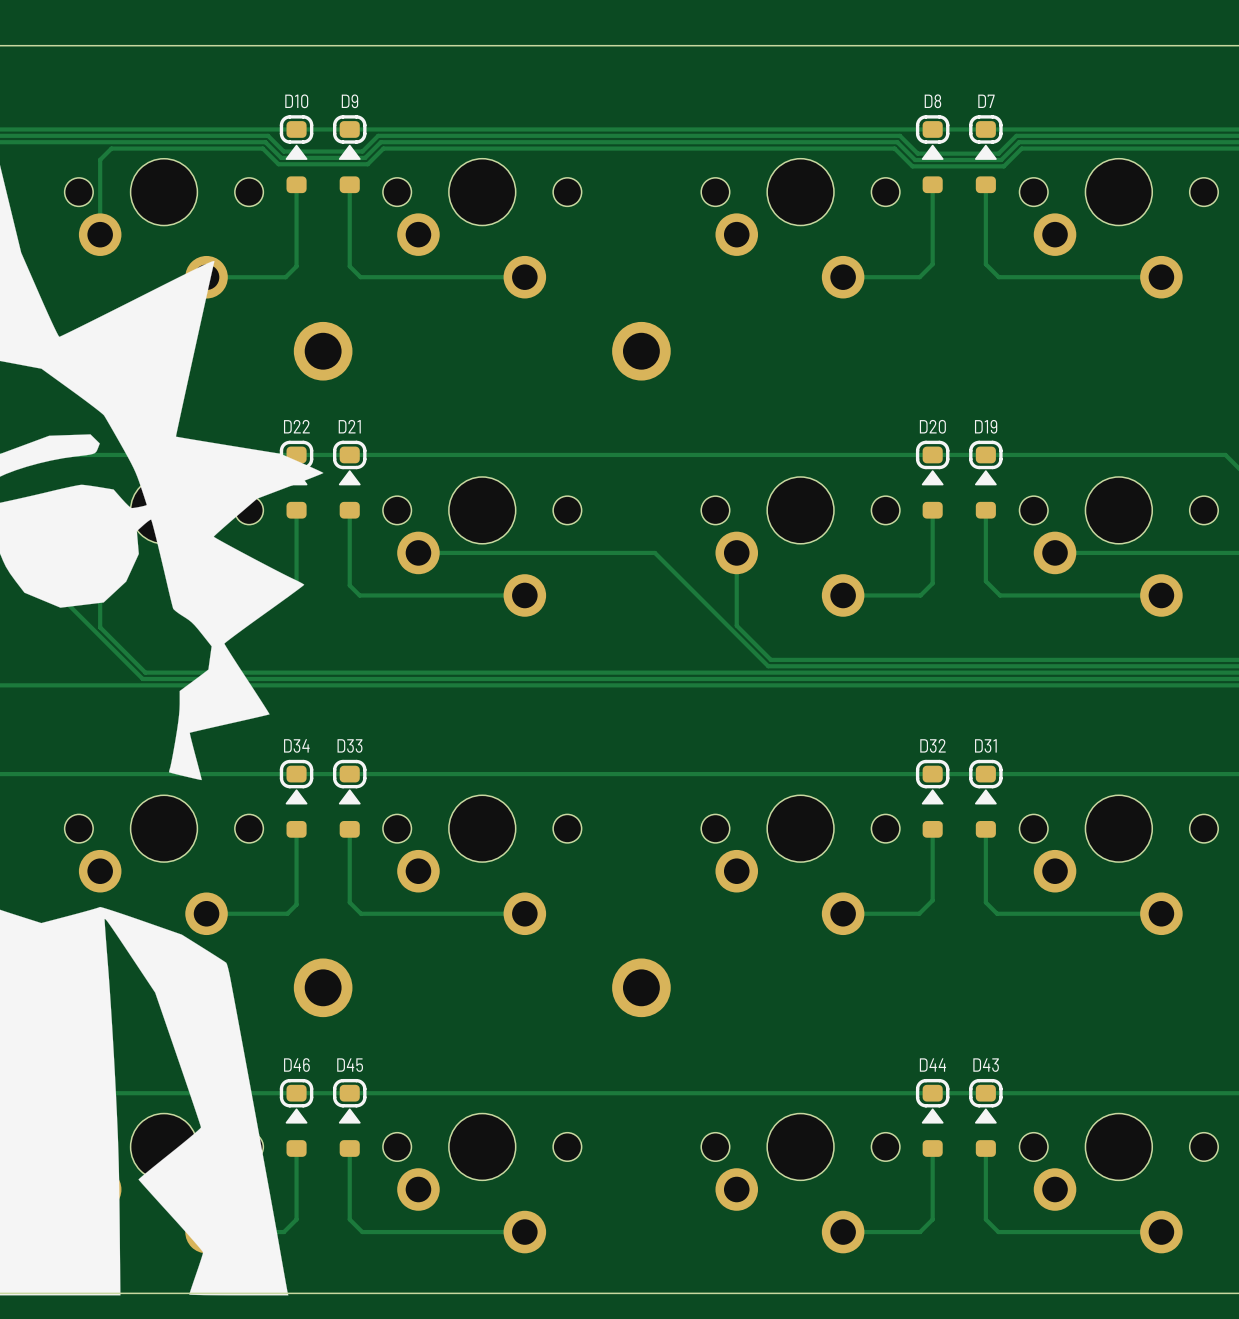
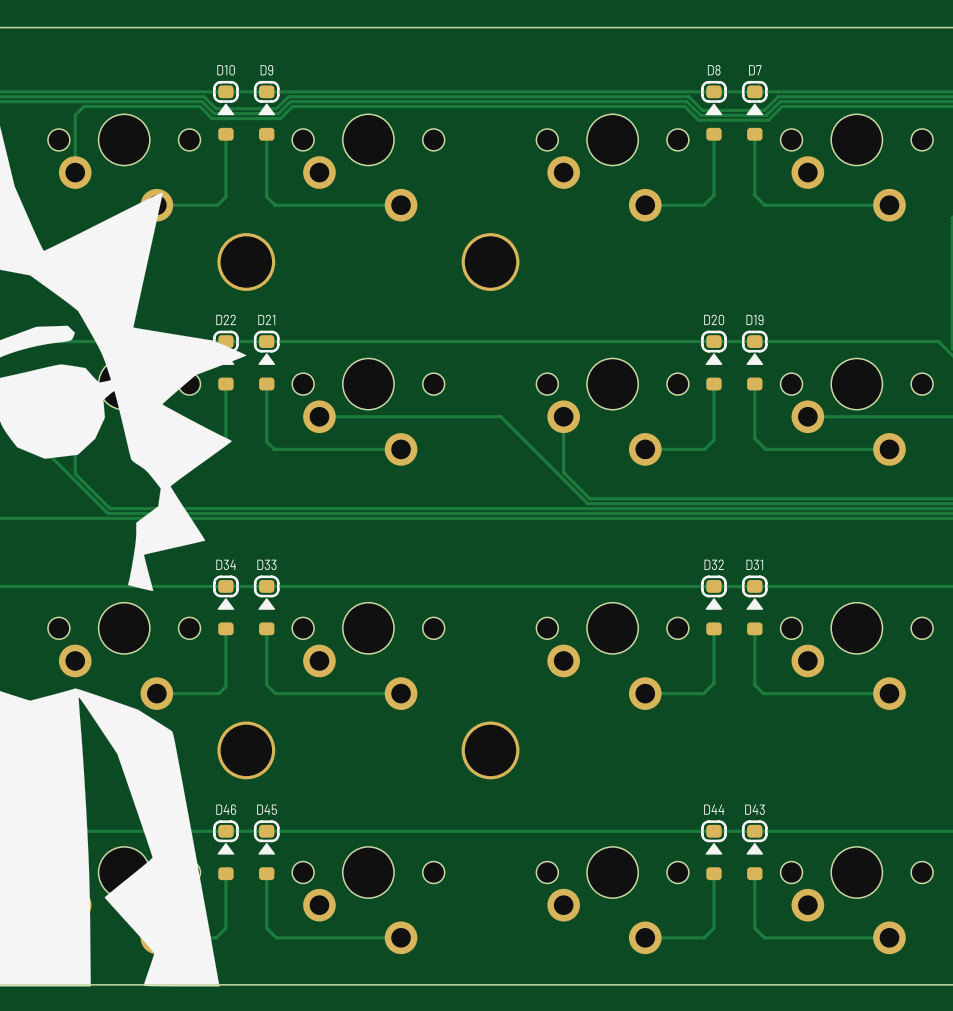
part footprint: [293, 321, 353, 381] -> [217, 233, 276, 291]
part footprint: [612, 321, 671, 381] -> [461, 233, 520, 291]
part footprint: [293, 958, 353, 1018] -> [217, 721, 276, 780]
part footprint: [612, 958, 671, 1018] -> [461, 721, 520, 780]

